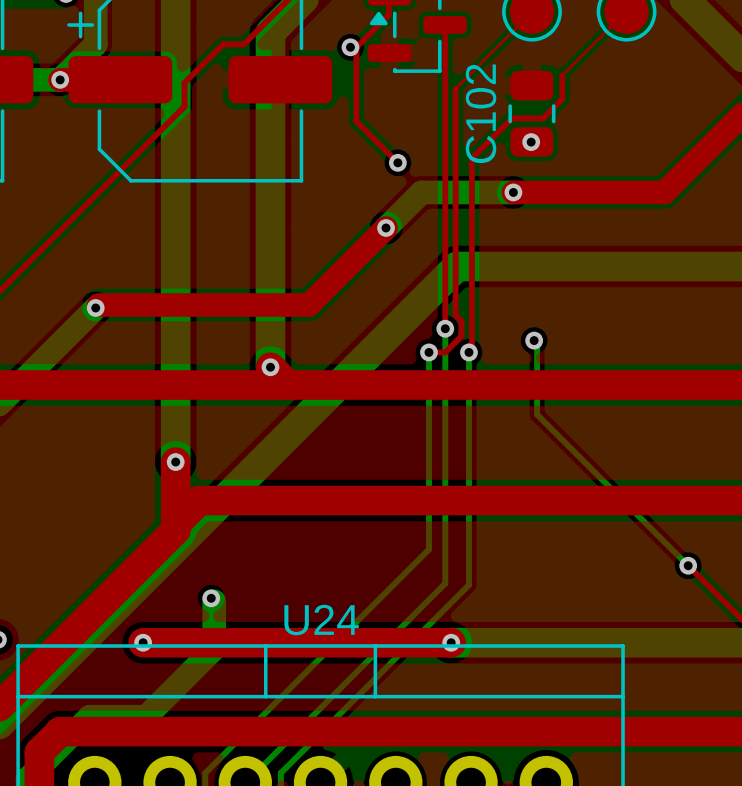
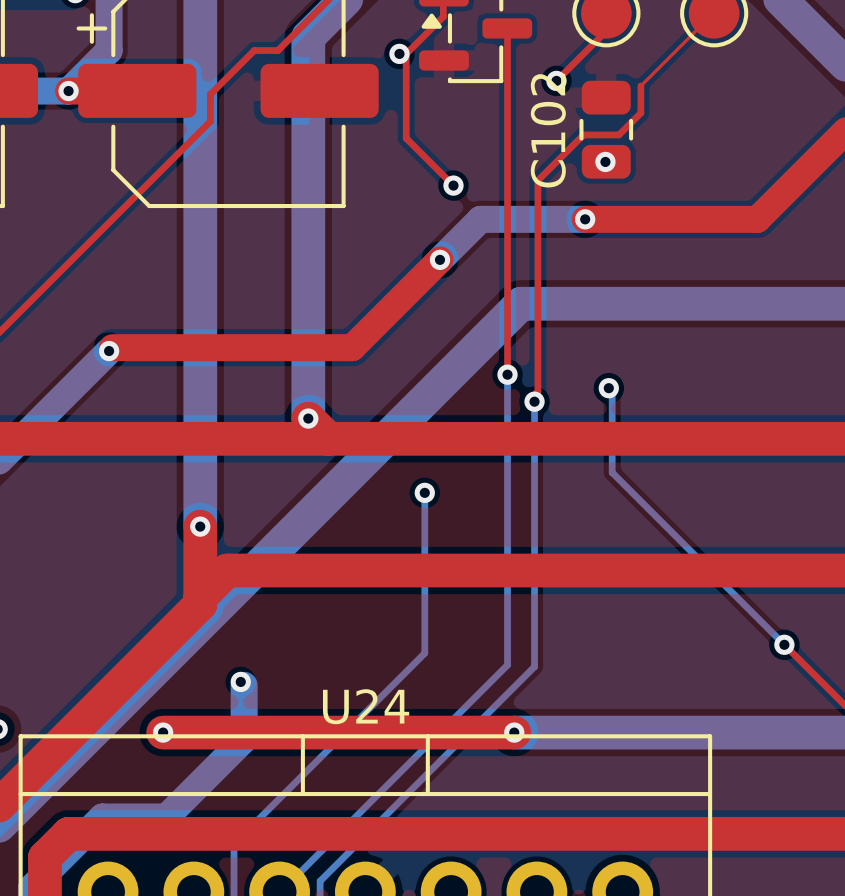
top track: (532, 11) (455, 88) (455, 315) (461, 321) (461, 336) (445, 352) (428, 352) -> none
top track: none -> (607, 30) (556, 80)
via: none -> (556, 80)
bottom track: (428, 352) (428, 549) (205, 773) -> (424, 492) (424, 653) (234, 844) (234, 881)
via position: (428, 352) -> (424, 492)

